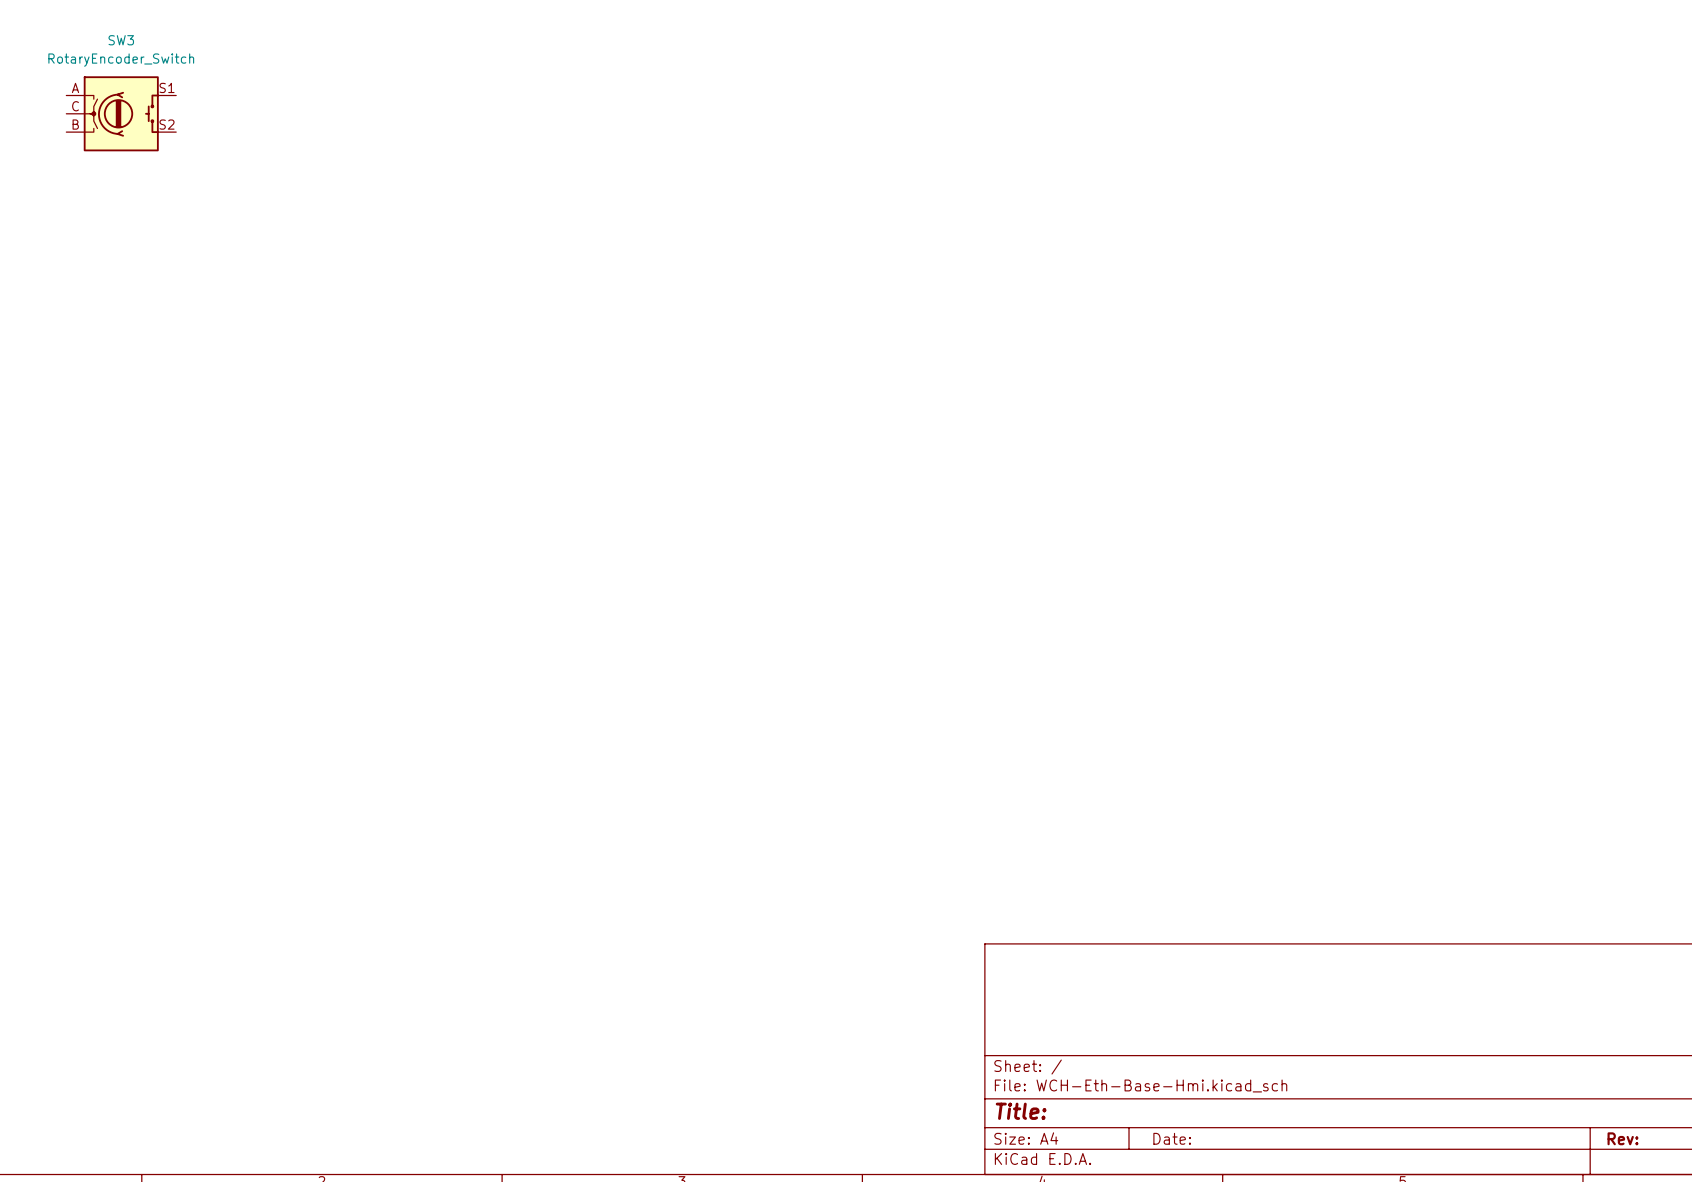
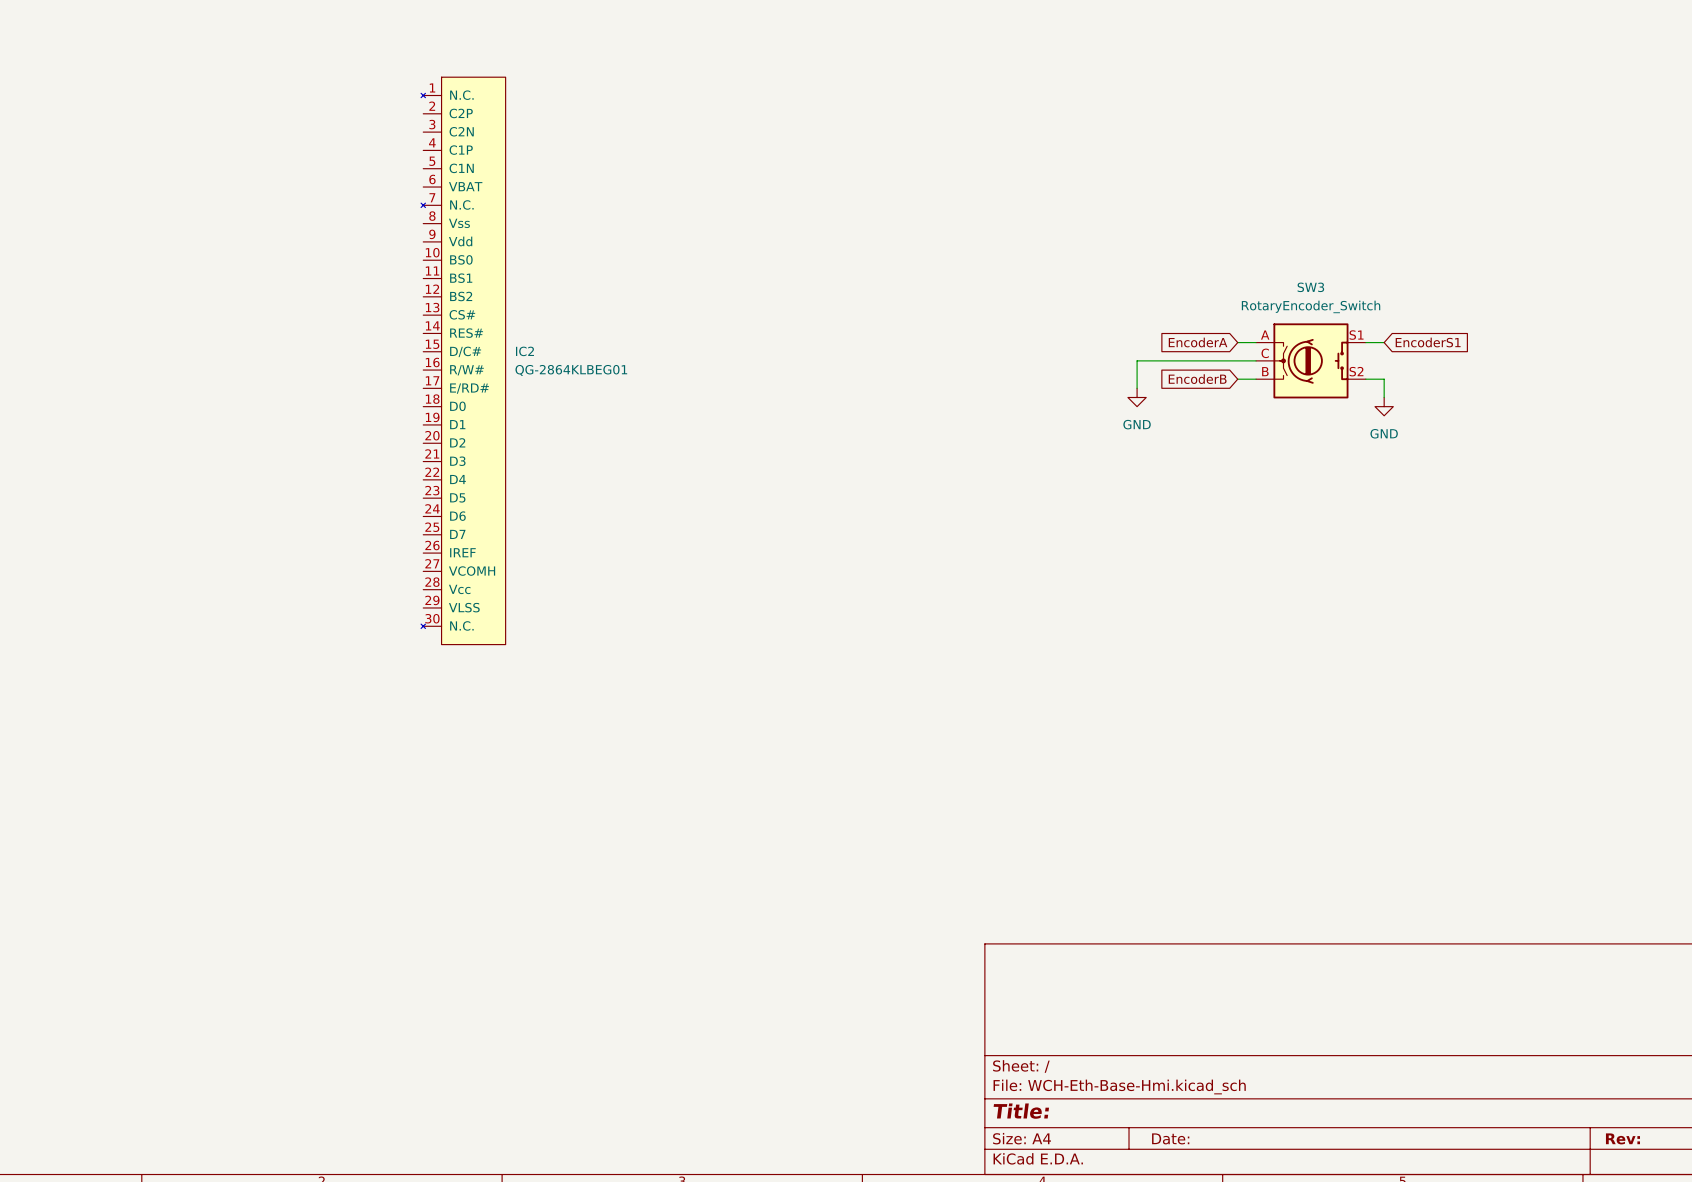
SW3 position: (121, 113) -> (1310, 360)
global label: none -> EncoderA (1198, 342)
wire: none -> (1237, 342) (1256, 342)
wire: none -> (1365, 342) (1384, 342)
global label: none -> EncoderS1 (1428, 342)
IC2: none -> QG-2864KLBEG01 (463, 360)
wire: none -> (1256, 360) (1137, 360) (1137, 388)
global label: none -> EncoderB (1197, 379)
wire: none -> (1237, 379) (1256, 379)
wire: none -> (1365, 379) (1384, 379) (1384, 397)
power symbol: none -> GND (1137, 397)
power symbol: none -> GND (1384, 406)

